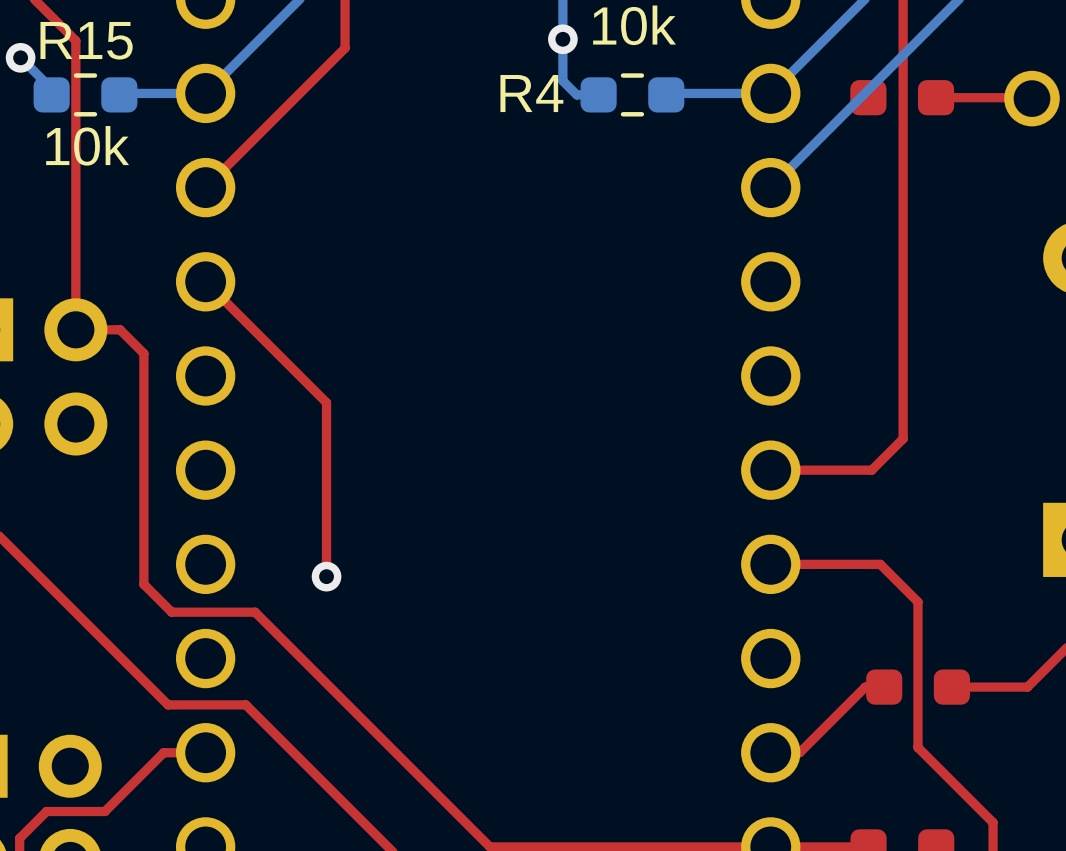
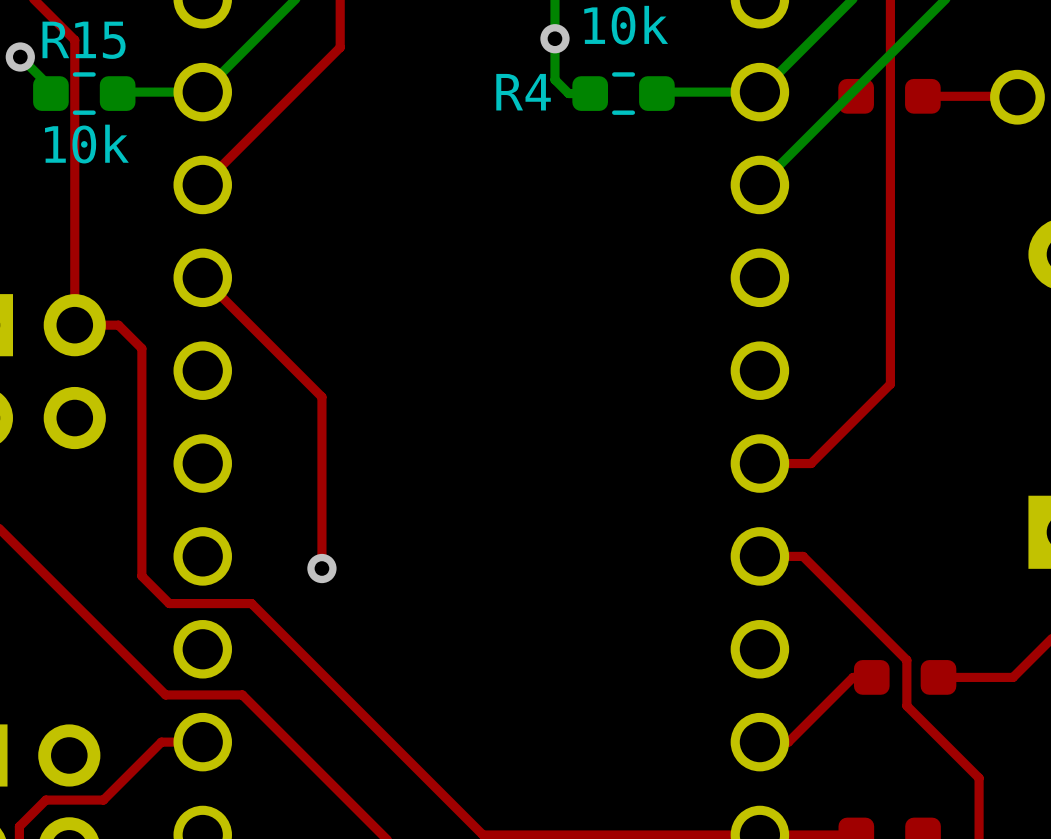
top track: (903, 389) (903, 438) (871, 470) (822, 470) -> (890, 384) (811, 463)
top track: (814, 564) (880, 564) (917, 601) (917, 747) (993, 822) -> (803, 556) (906, 660) (906, 705) (979, 778) (979, 811)

